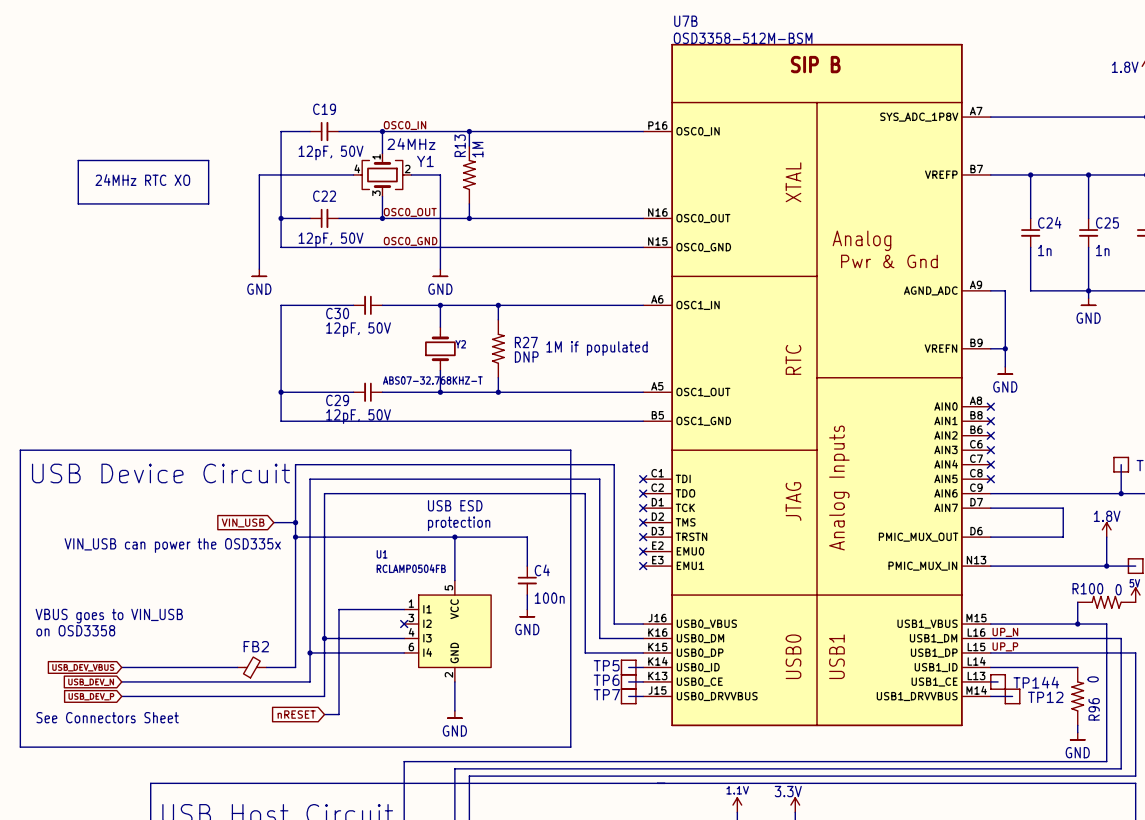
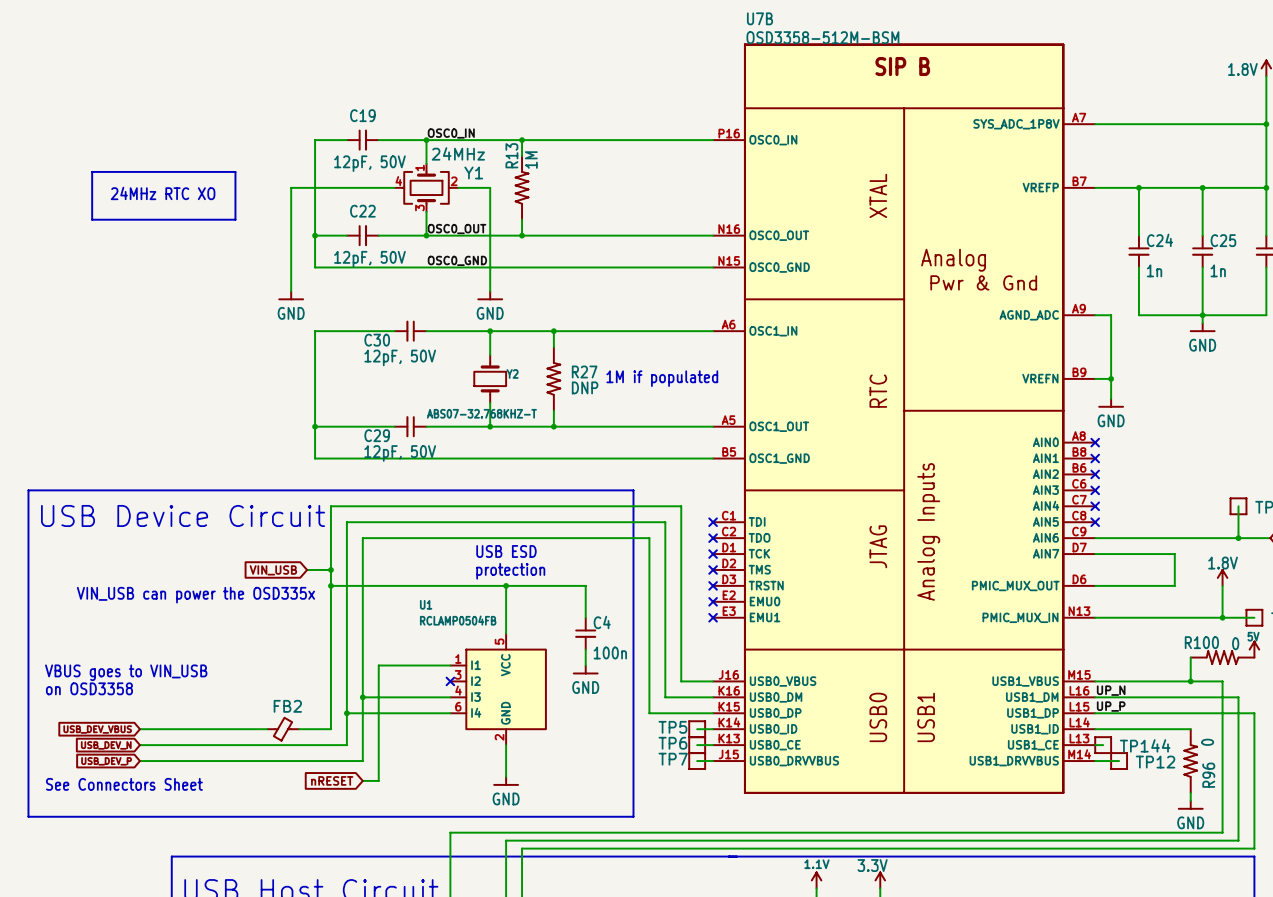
power symbol shape: [252, 269, 267, 277] -> [278, 291, 304, 301]
power symbol shape: [433, 269, 448, 277] -> [477, 291, 503, 301]
power symbol shape: [1081, 298, 1096, 306] -> [1189, 323, 1216, 332]
power symbol shape: [998, 366, 1013, 375] -> [1098, 398, 1124, 408]
power symbol shape: [520, 609, 535, 617] -> [572, 665, 599, 675]
power symbol shape: [447, 710, 463, 719] -> [493, 776, 519, 786]
power symbol shape: [1070, 732, 1085, 740] -> [1177, 800, 1204, 810]

